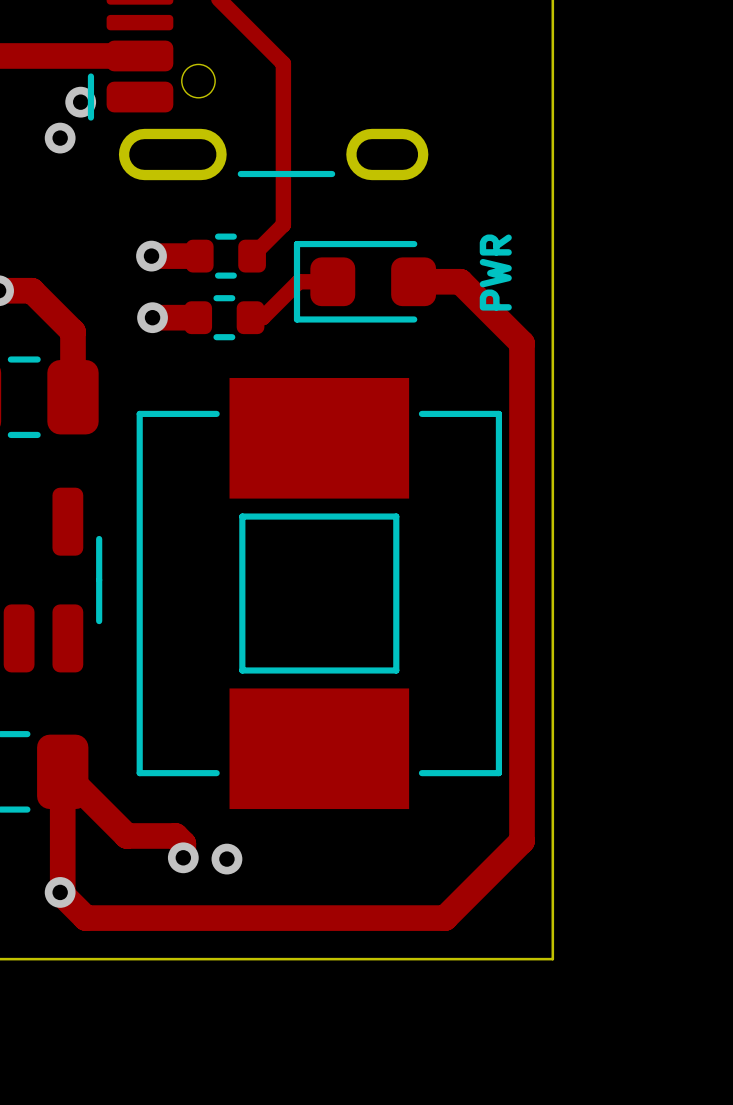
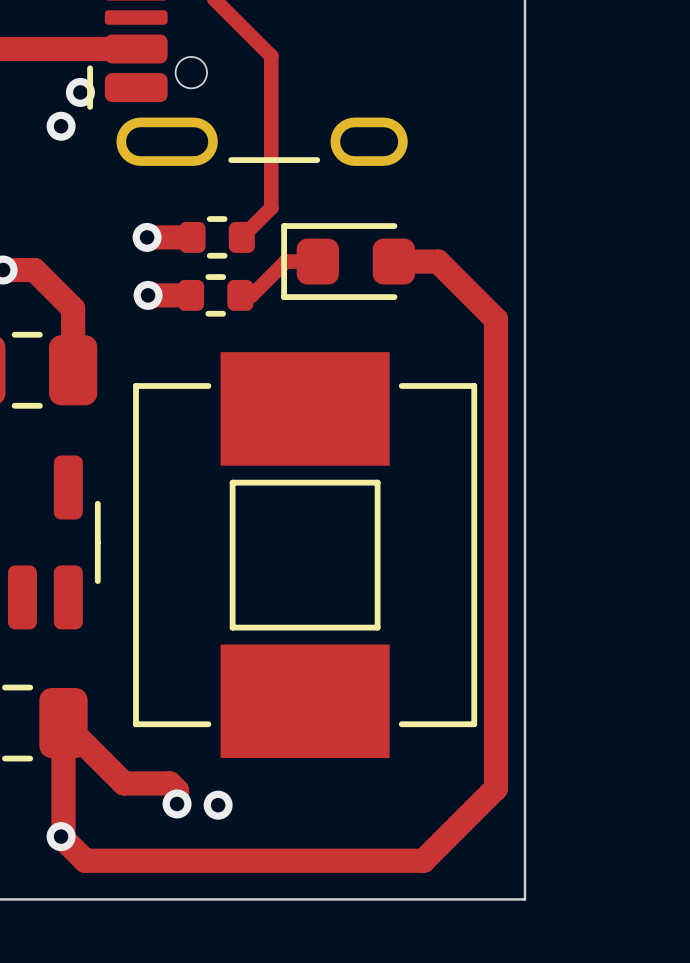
text: PWR (495, 272) -> none

